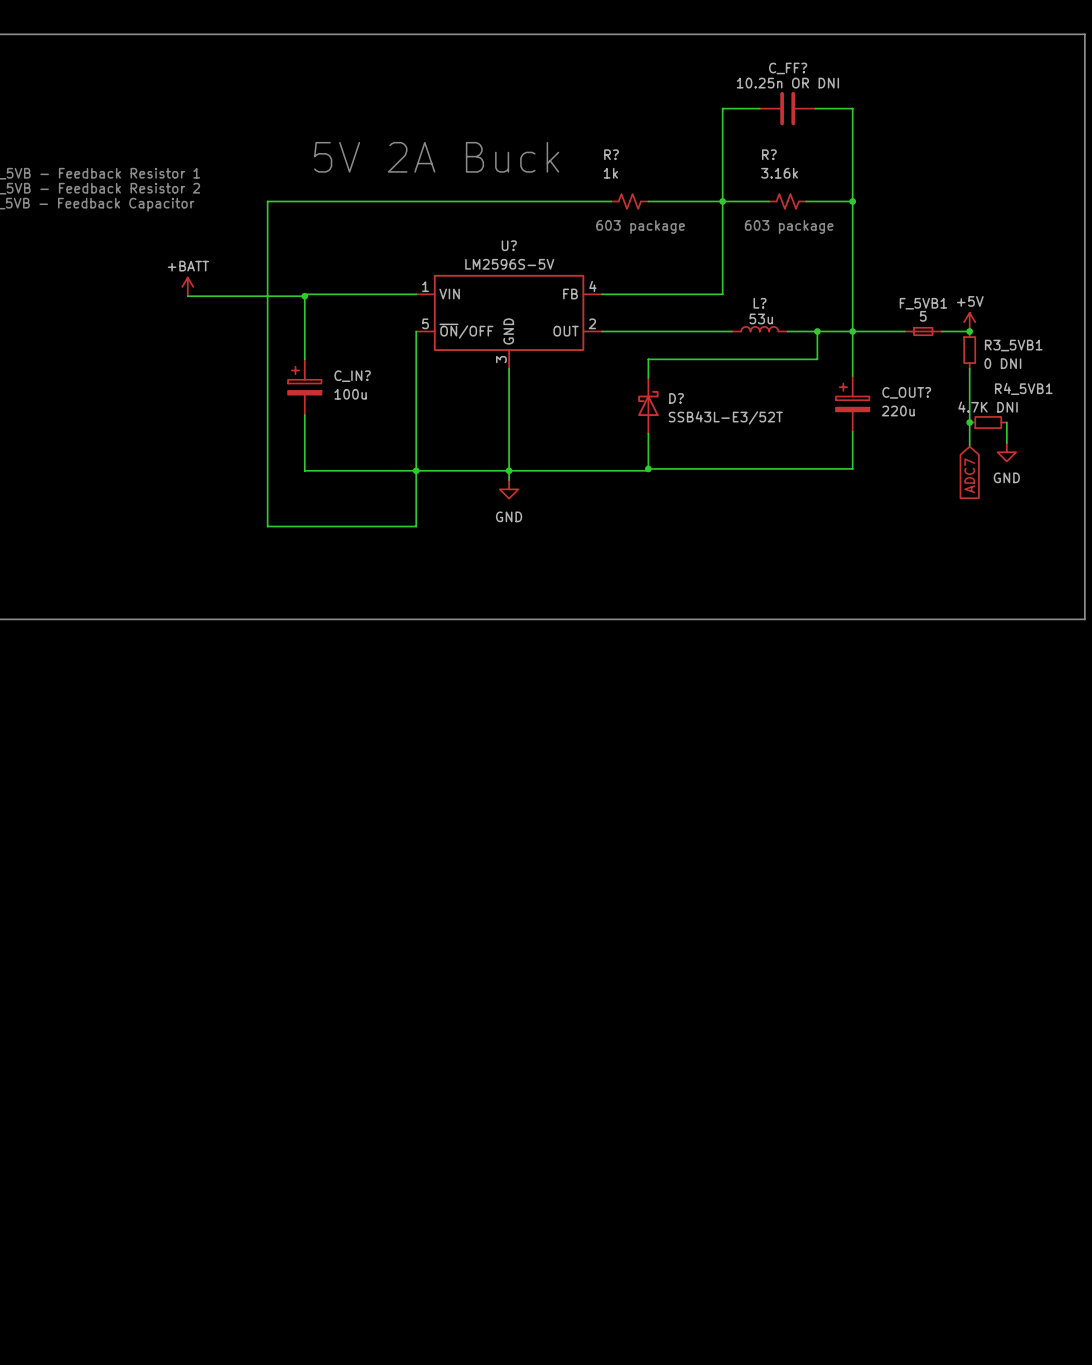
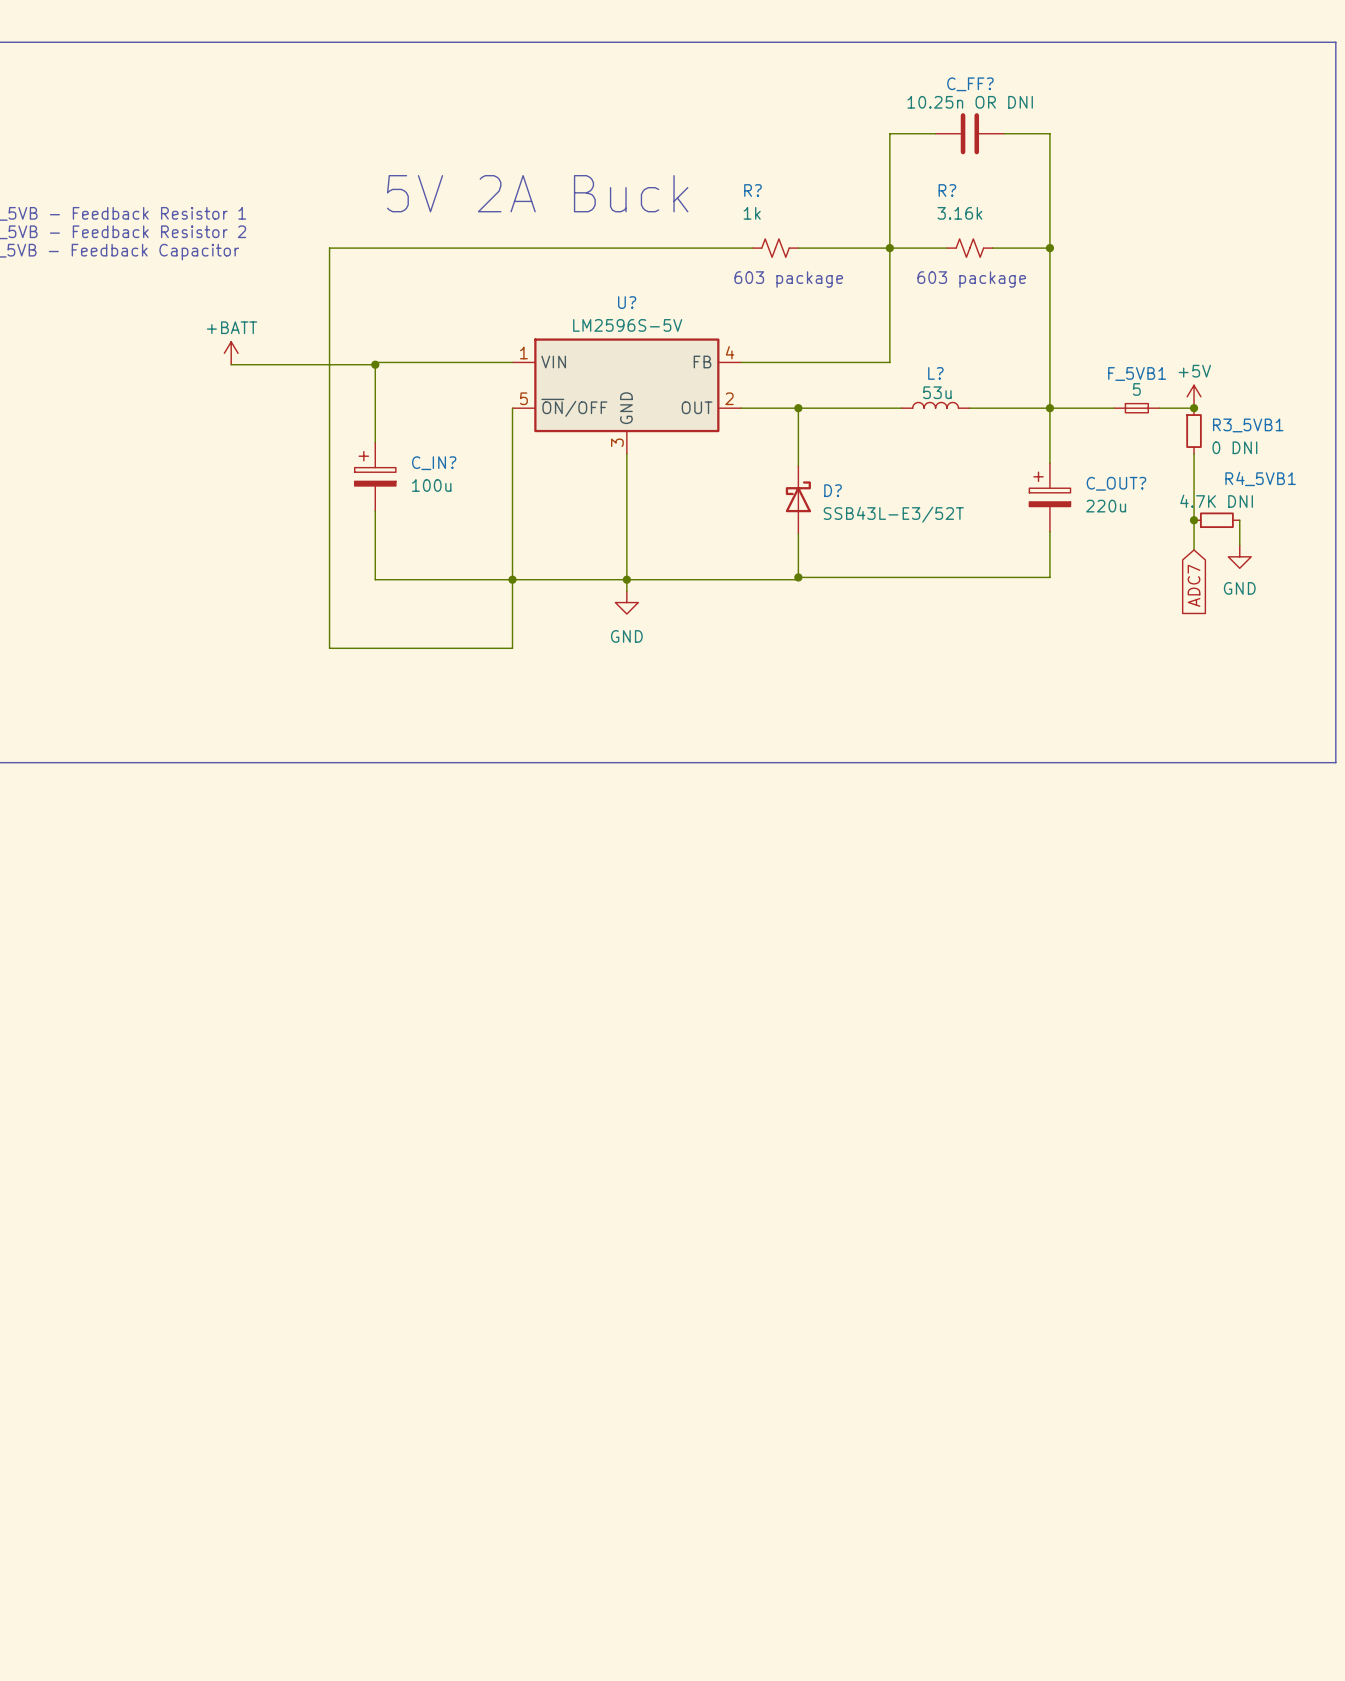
junction: none -> (798, 408)
wire: (817, 331) (817, 359) (648, 359) -> (798, 408) (798, 442)
junction: (817, 331) -> none

